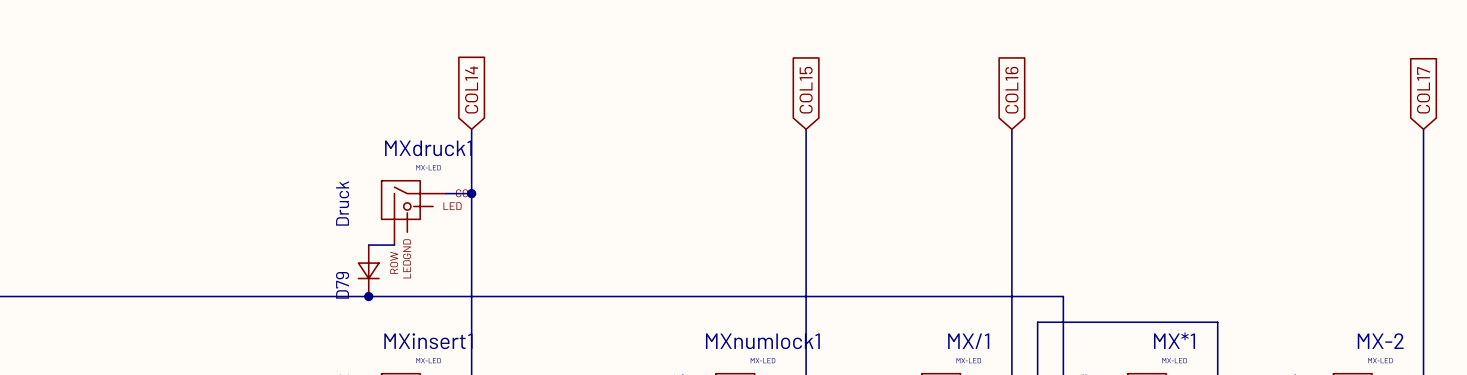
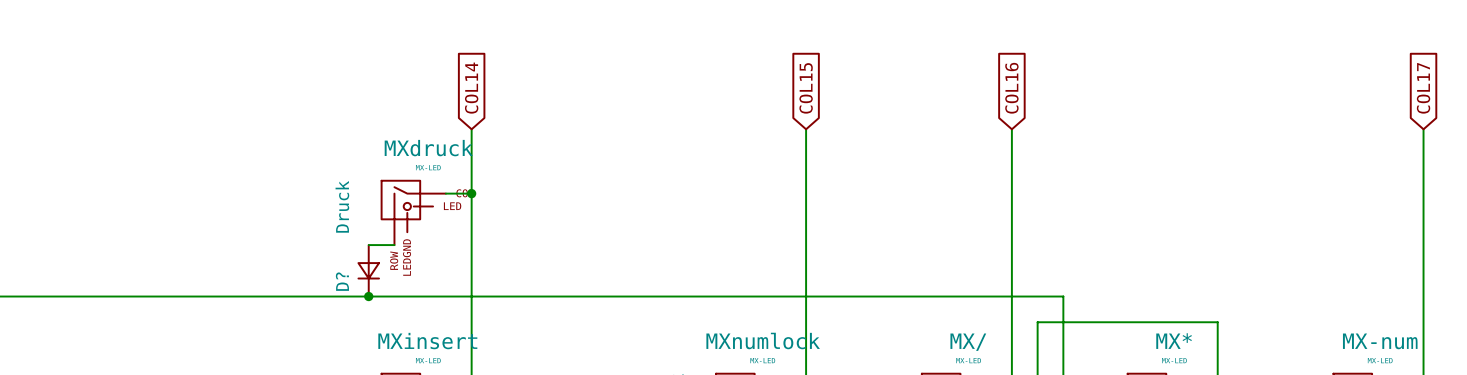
MXdruck1 name: MXdruck1 (428, 148) -> MXdruck (428, 148)
D79 name: D79 (342, 285) -> D? (342, 281)
MX*1 name: MX*1 (1174, 340) -> MX* (1174, 341)
MXinsert1 name: MXinsert1 (428, 341) -> MXinsert (427, 341)
MXnumlock1 name: MXnumlock1 (762, 341) -> MXnumlock (763, 340)
MX/1 name: MX/1 (968, 341) -> MX/ (968, 342)
MX-2 name: MX-2 (1380, 341) -> MX-num (1380, 341)

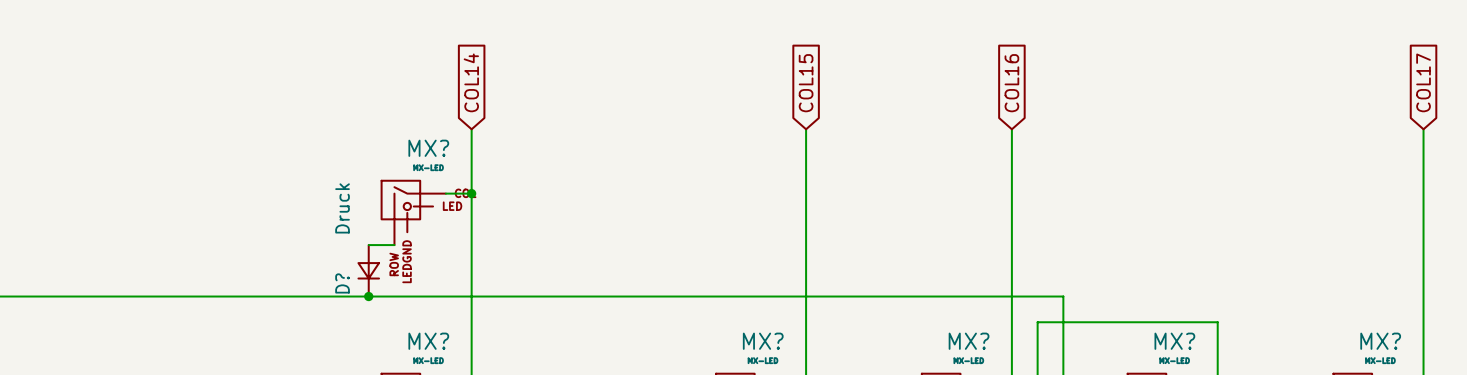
MXdruck name: MXdruck (428, 148) -> MX? (428, 148)
MXnumlock name: MXnumlock (763, 340) -> MX? (763, 341)
MXinsert name: MXinsert (427, 341) -> MX? (428, 341)
MX* name: MX* (1174, 341) -> MX? (1174, 341)
MX-num name: MX-num (1380, 341) -> MX? (1380, 341)
MX/ name: MX/ (968, 342) -> MX? (969, 341)

